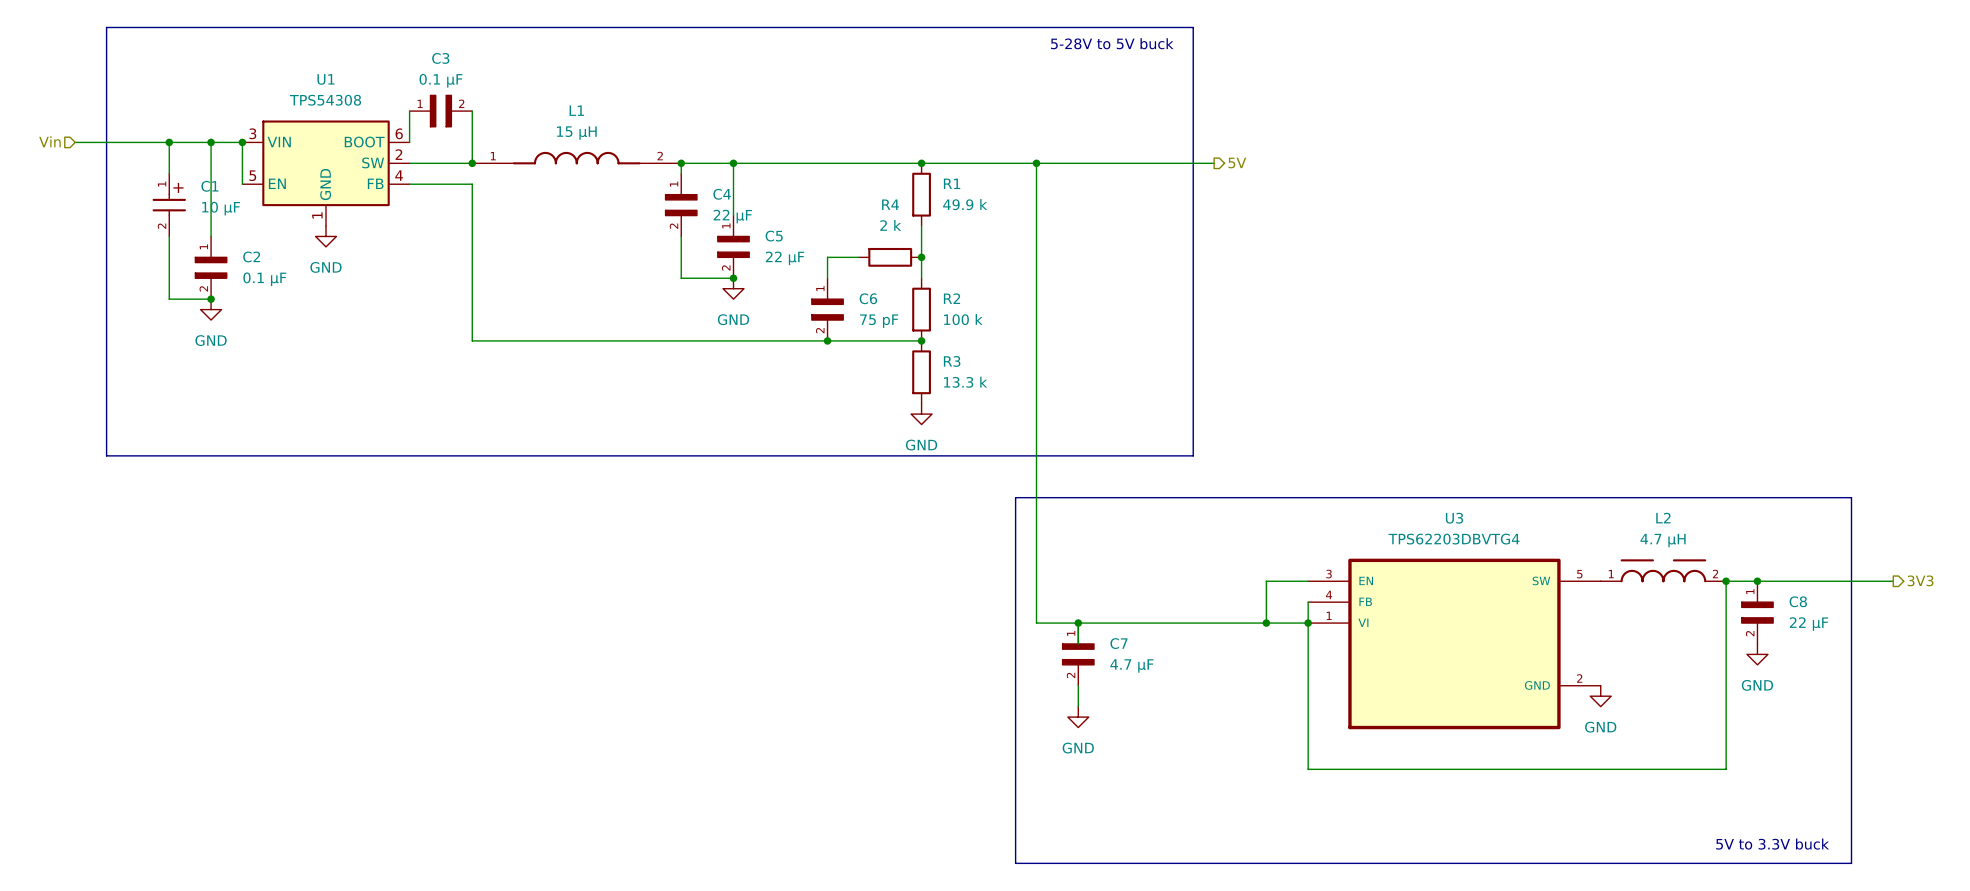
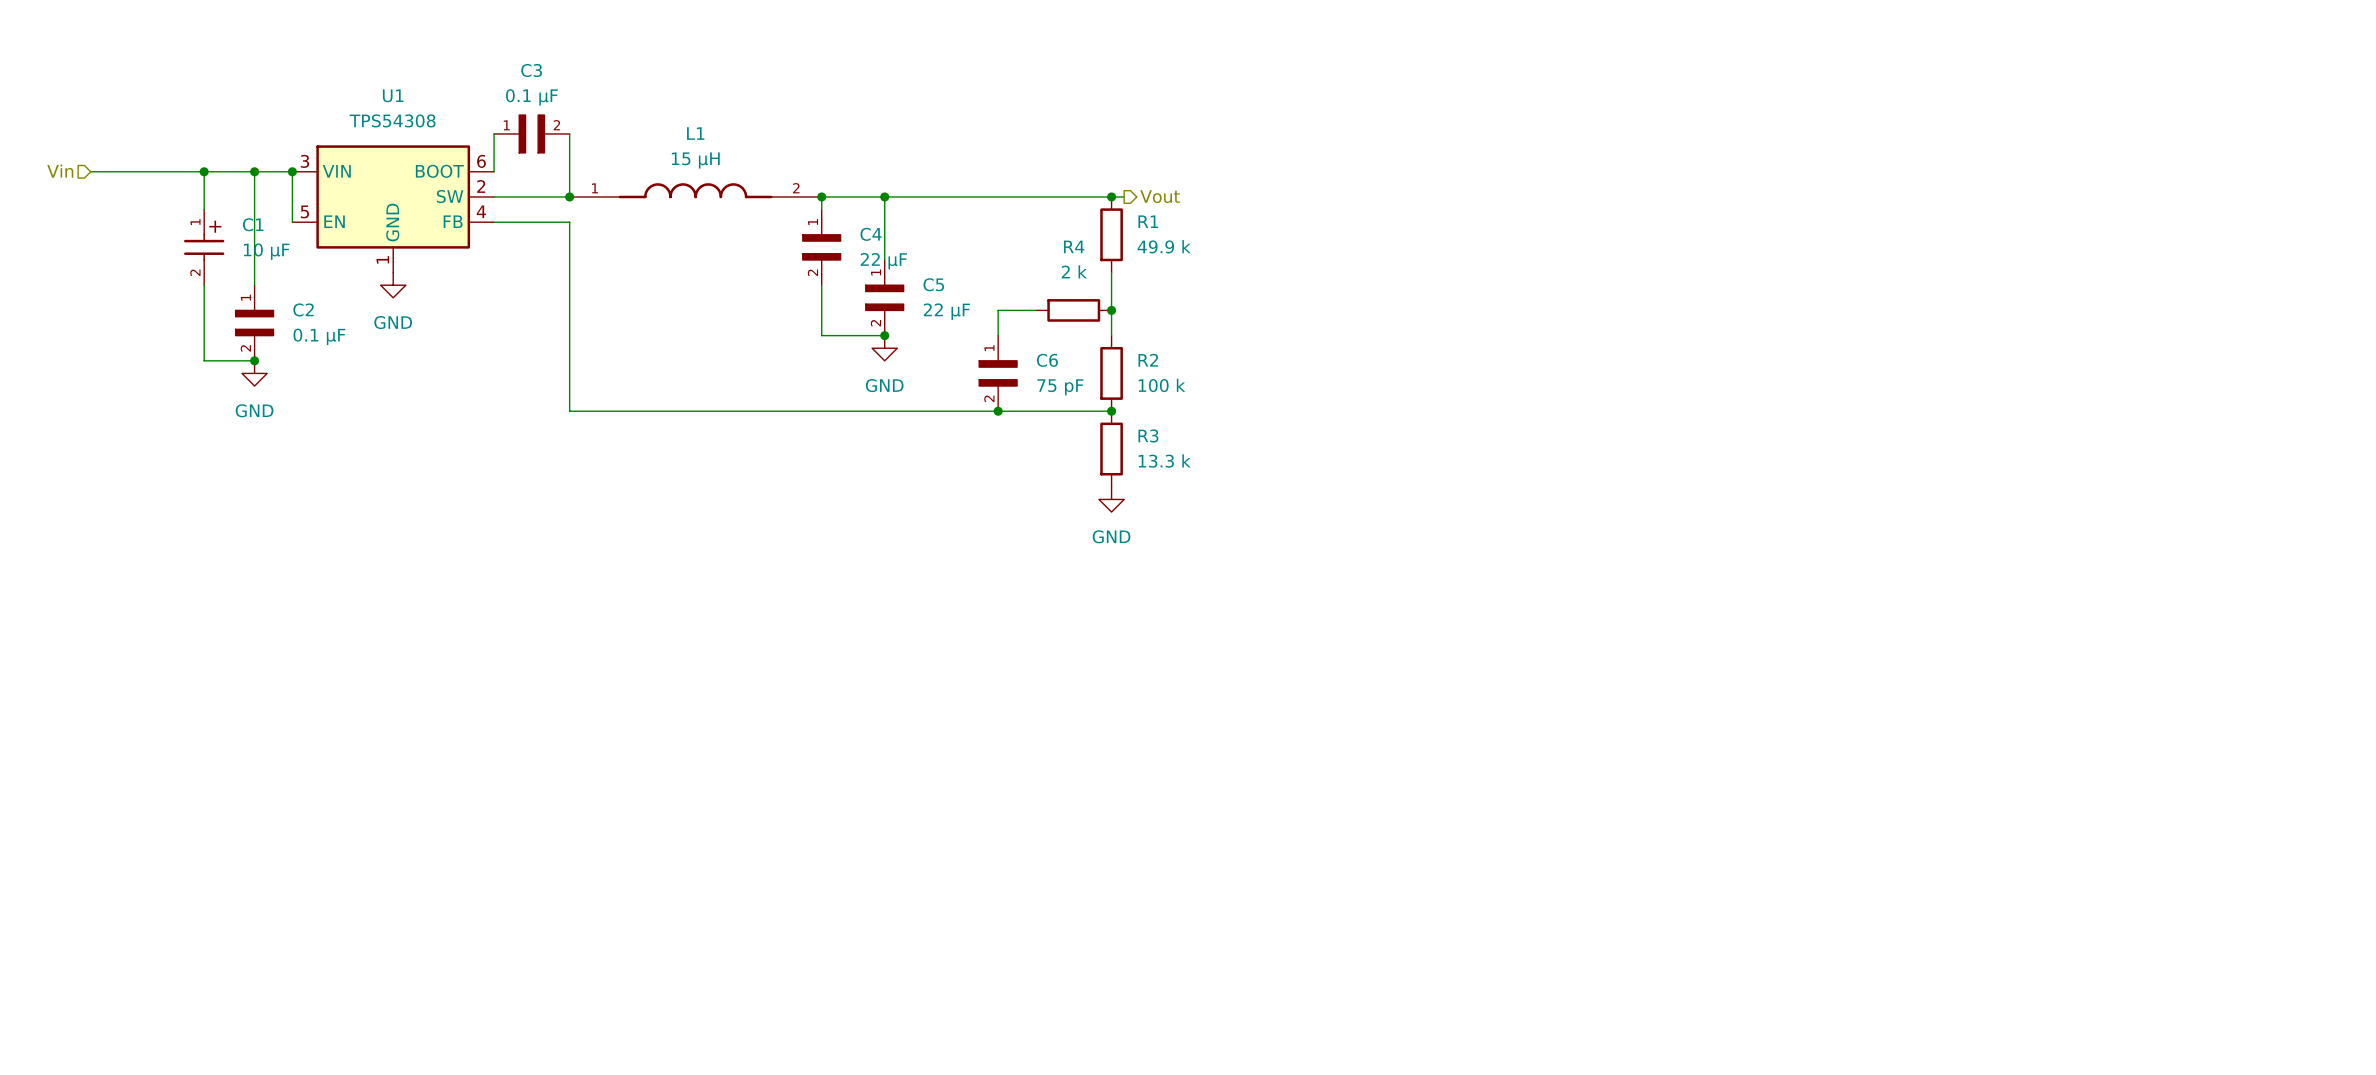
line: (106, 27) (1193, 27) (1193, 455) (106, 455) (106, 27) -> none
text: 5-28V to 5V buck (1112, 43) -> none
wire: (932, 163) (1214, 163) -> none
hierarchical label: none -> Vout (1160, 196)
wire: (1036, 163) (1036, 623) (1308, 623) -> none
junction: (1036, 163) -> none
hierarchical label: 5V (1237, 163) -> none
line: (1015, 497) (1851, 497) (1851, 863) (1015, 863) (1015, 497) -> none
L2: 4.7 µH (1663, 570) -> none
hierarchical label: 3V3 (1920, 580) -> none
wire: (1308, 581) (1266, 581) (1266, 623) -> none
junction: (1726, 581) -> none
junction: (1757, 581) -> none
wire: (1893, 581) (1726, 581) (1726, 769) (1308, 769) (1308, 602) -> none
C8: 22 µF (1757, 612) -> none
wire: (1078, 623) (1078, 643) -> none
junction: (1078, 623) -> none
junction: (1266, 623) -> none
junction: (1308, 623) -> none
U3: TPS62203DBVTG4 (1454, 643) -> none
C7: 4.7 µF (1078, 654) -> none
power symbol: GND (1757, 654) -> none
wire: (1078, 685) (1078, 706) -> none
power symbol: GND (1600, 696) -> none
power symbol: GND (1078, 717) -> none
text: 5V to 3.3V buck (1772, 844) -> none

